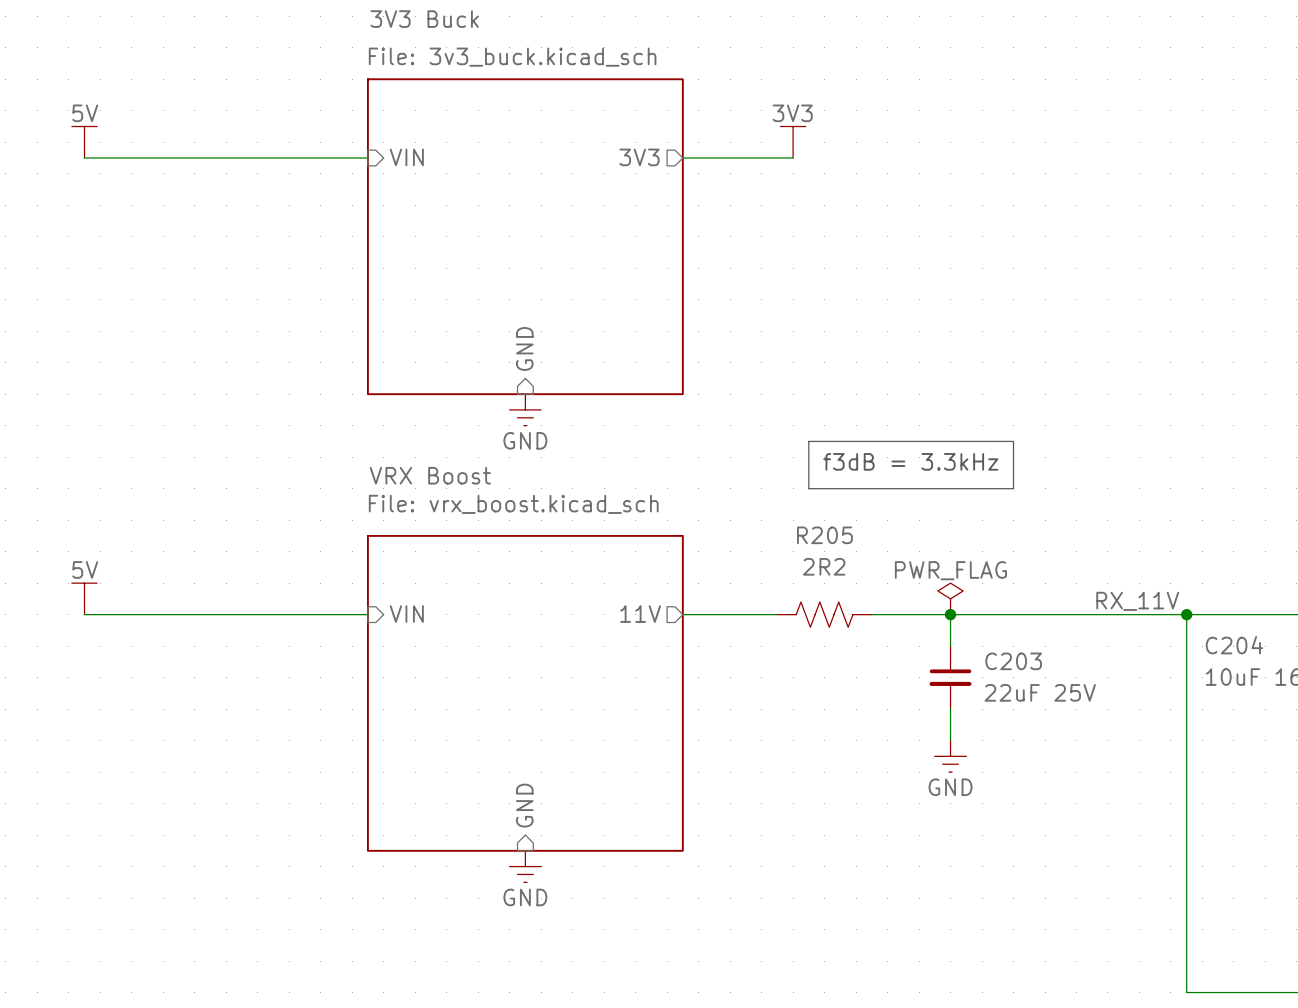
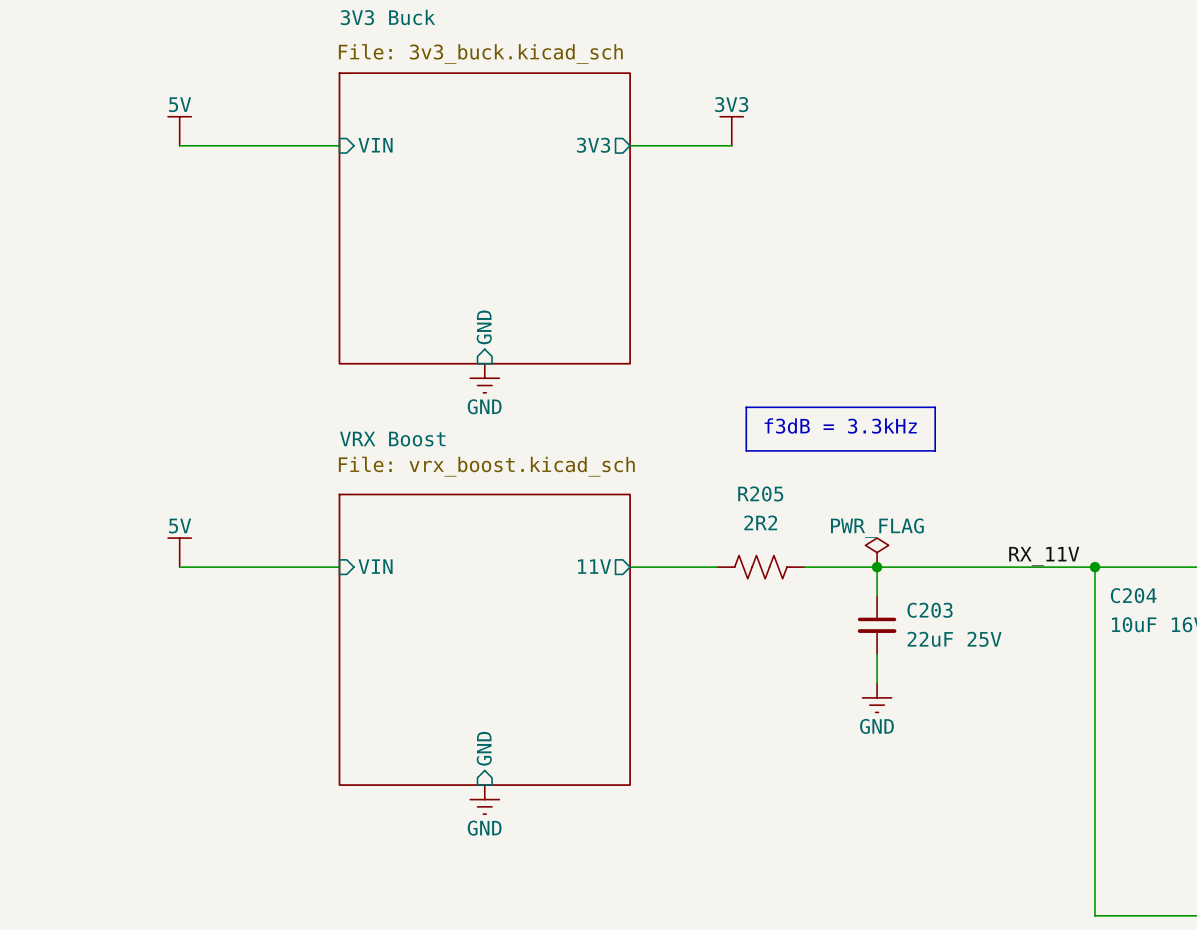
power symbol position: 5V (84, 142) -> 5V (179, 131)
wire: (84, 158) (194, 158) -> none
power symbol position: 5V (84, 598) -> 5V (179, 552)
wire: (84, 614) (194, 614) -> none

